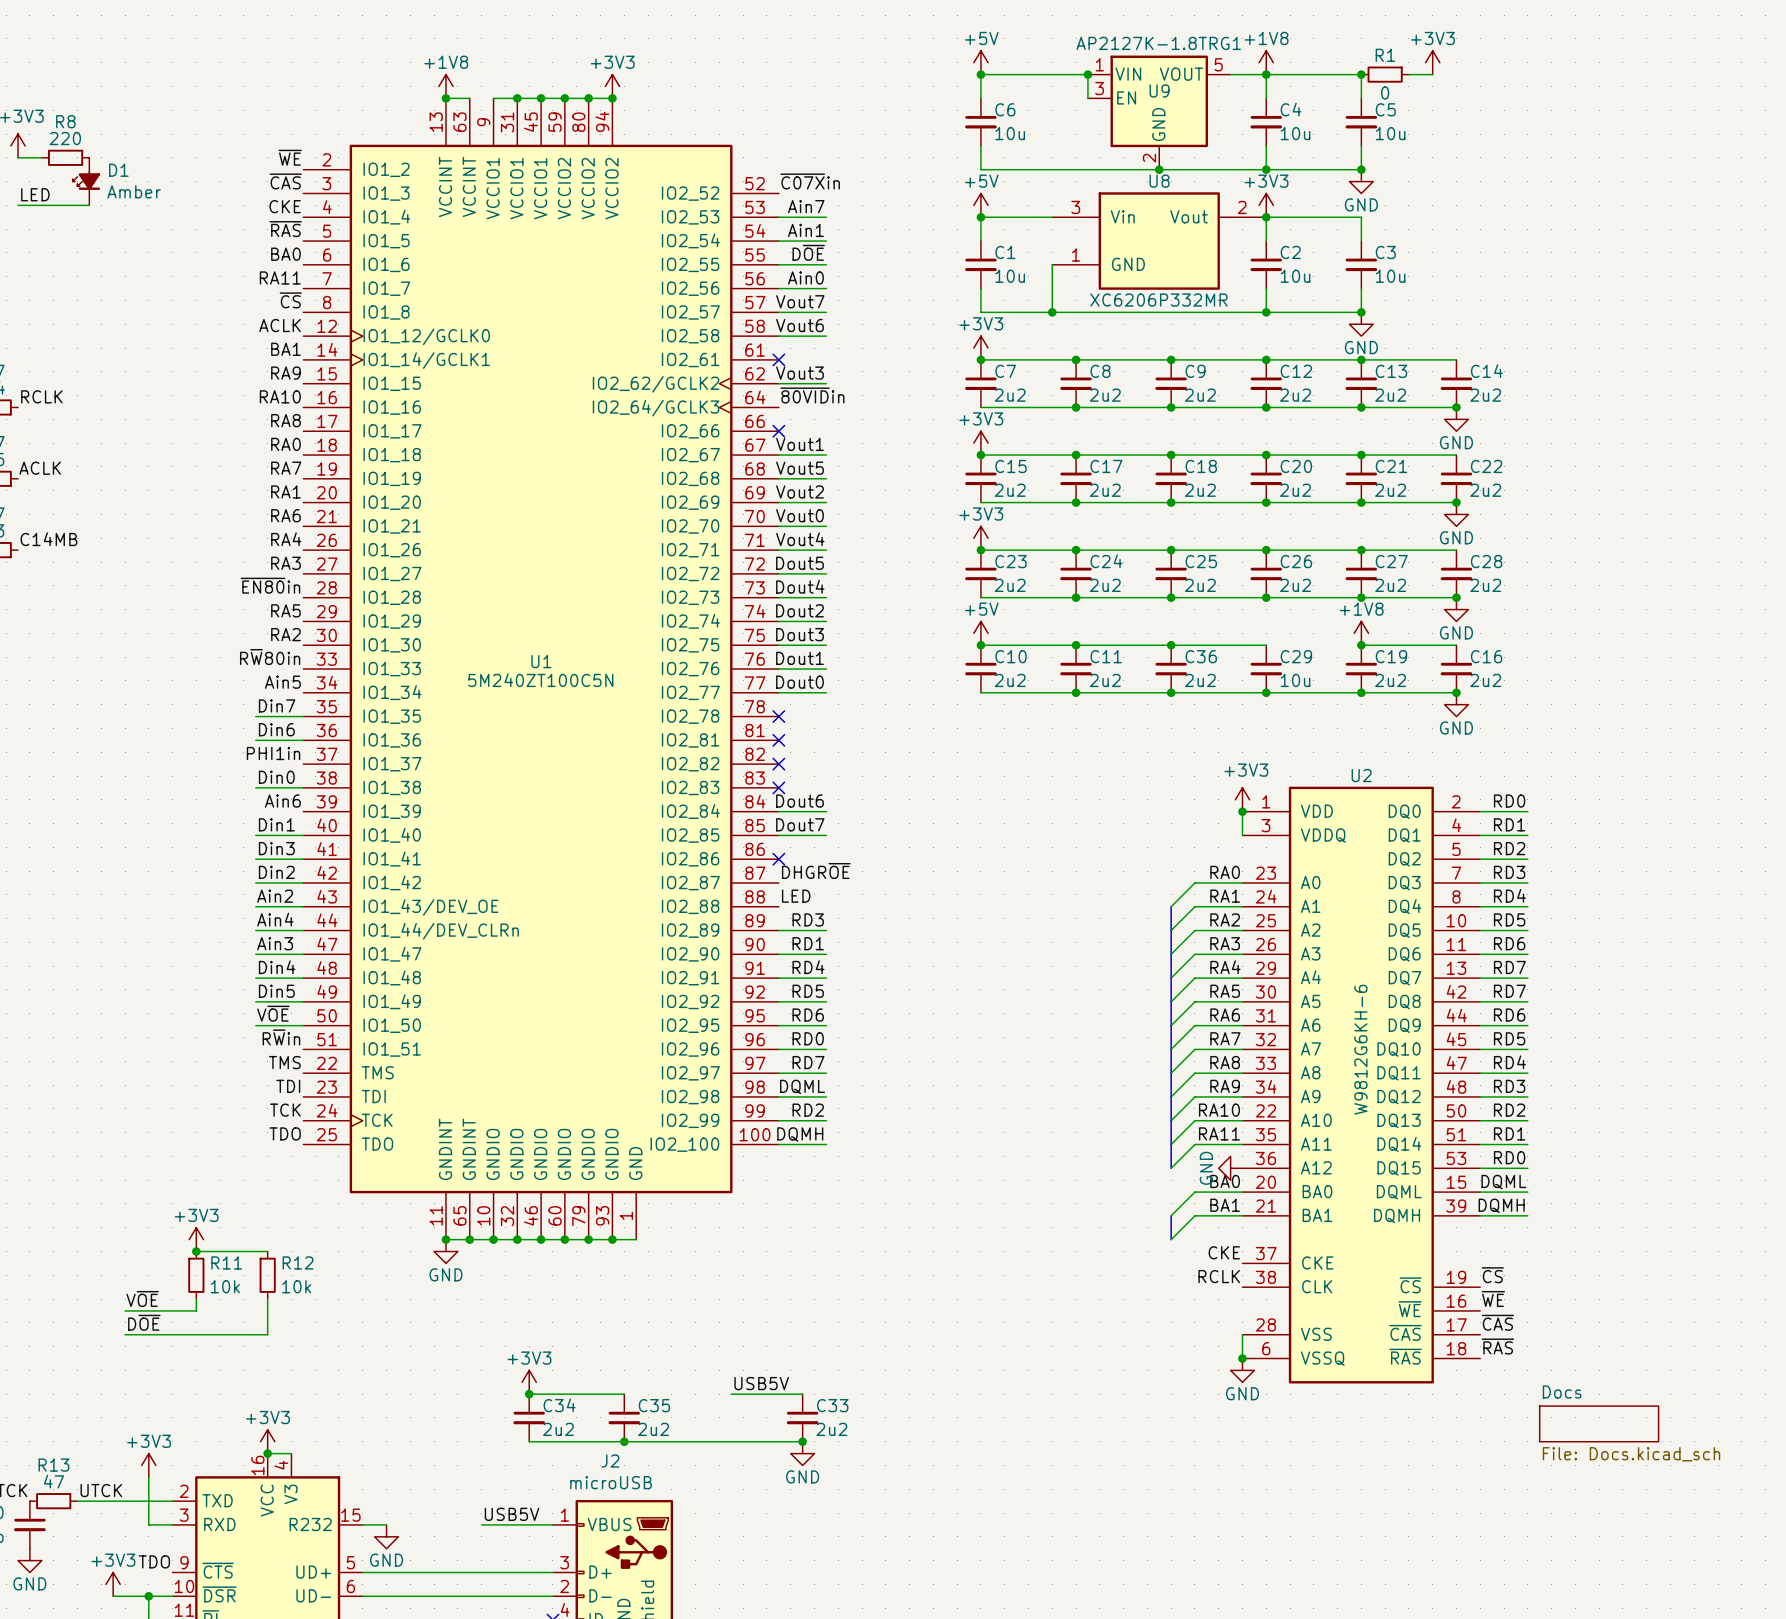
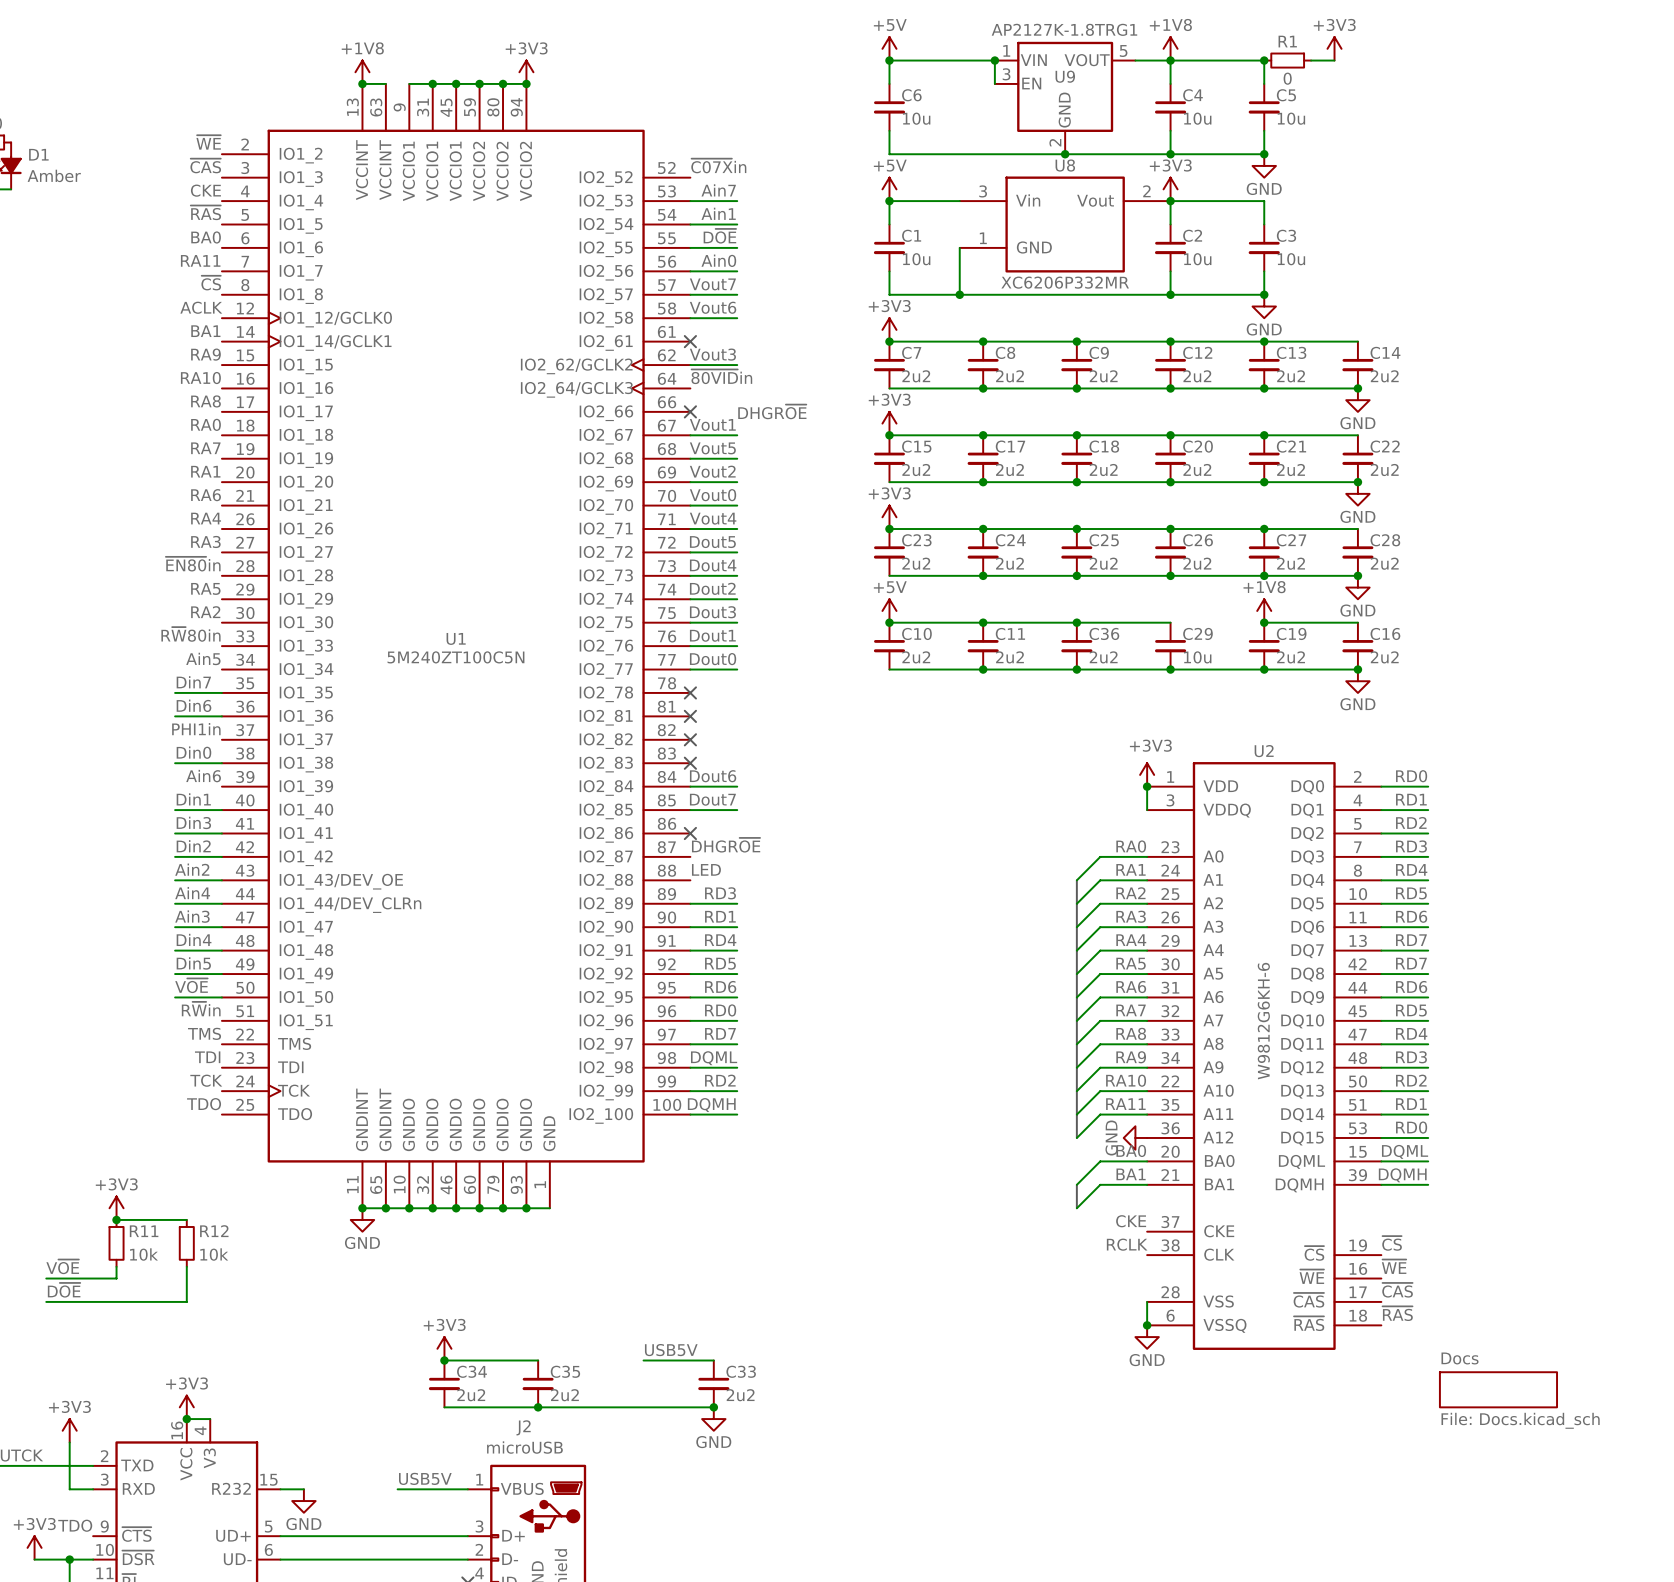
label: none -> DHGR~{OE} (772, 411)

